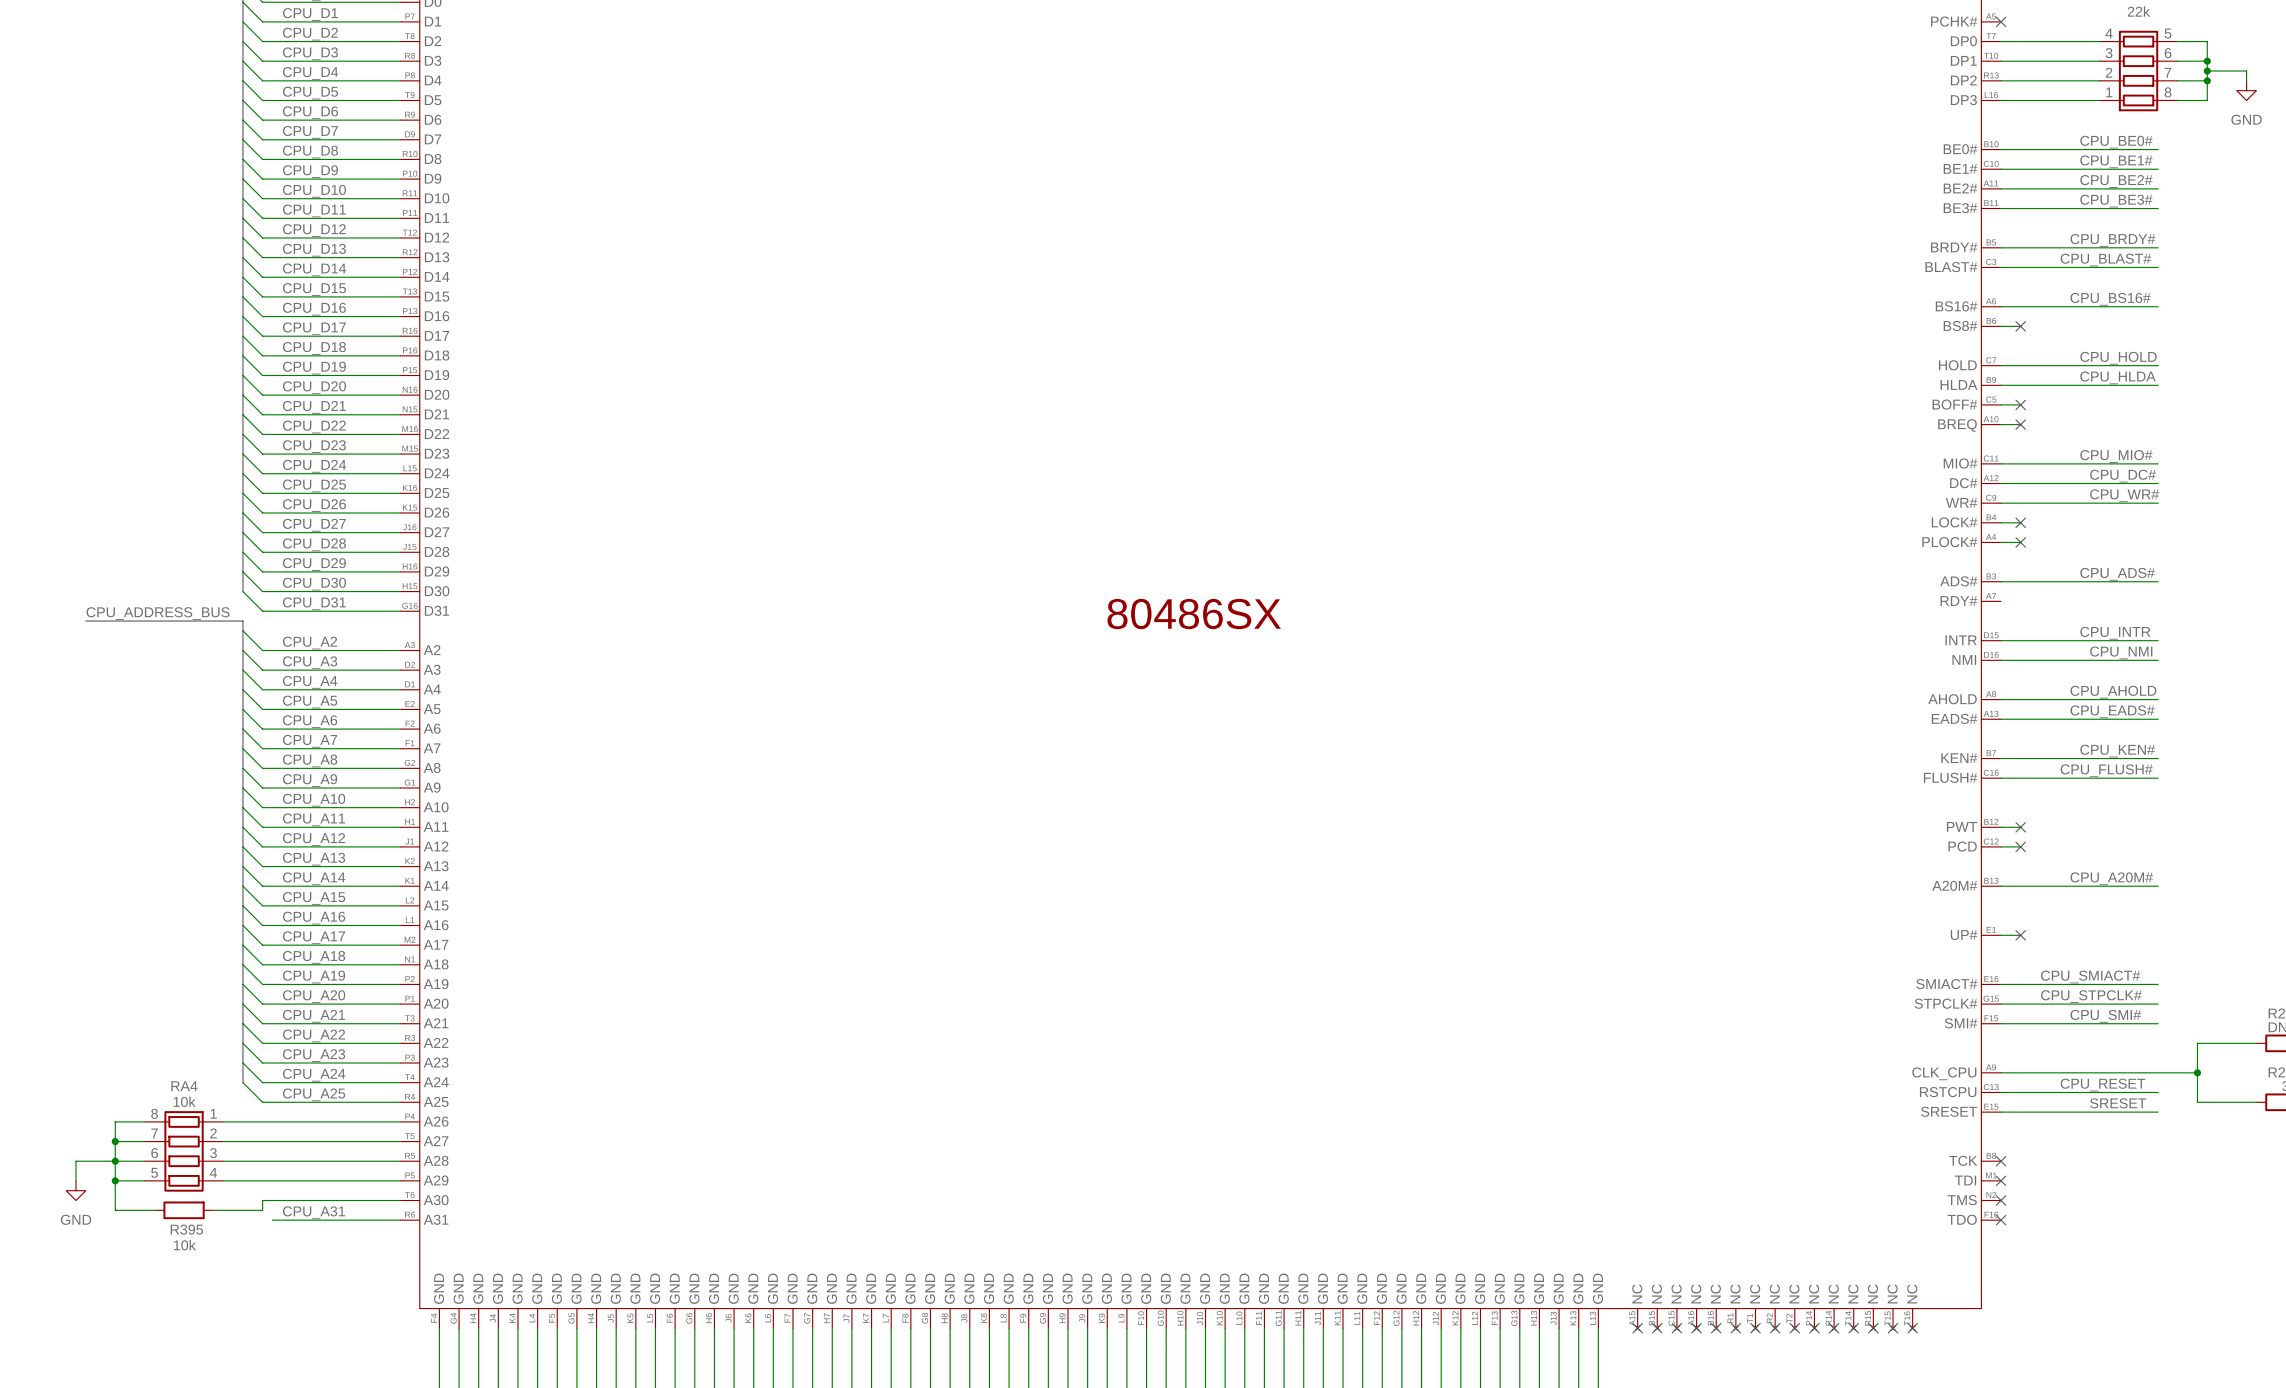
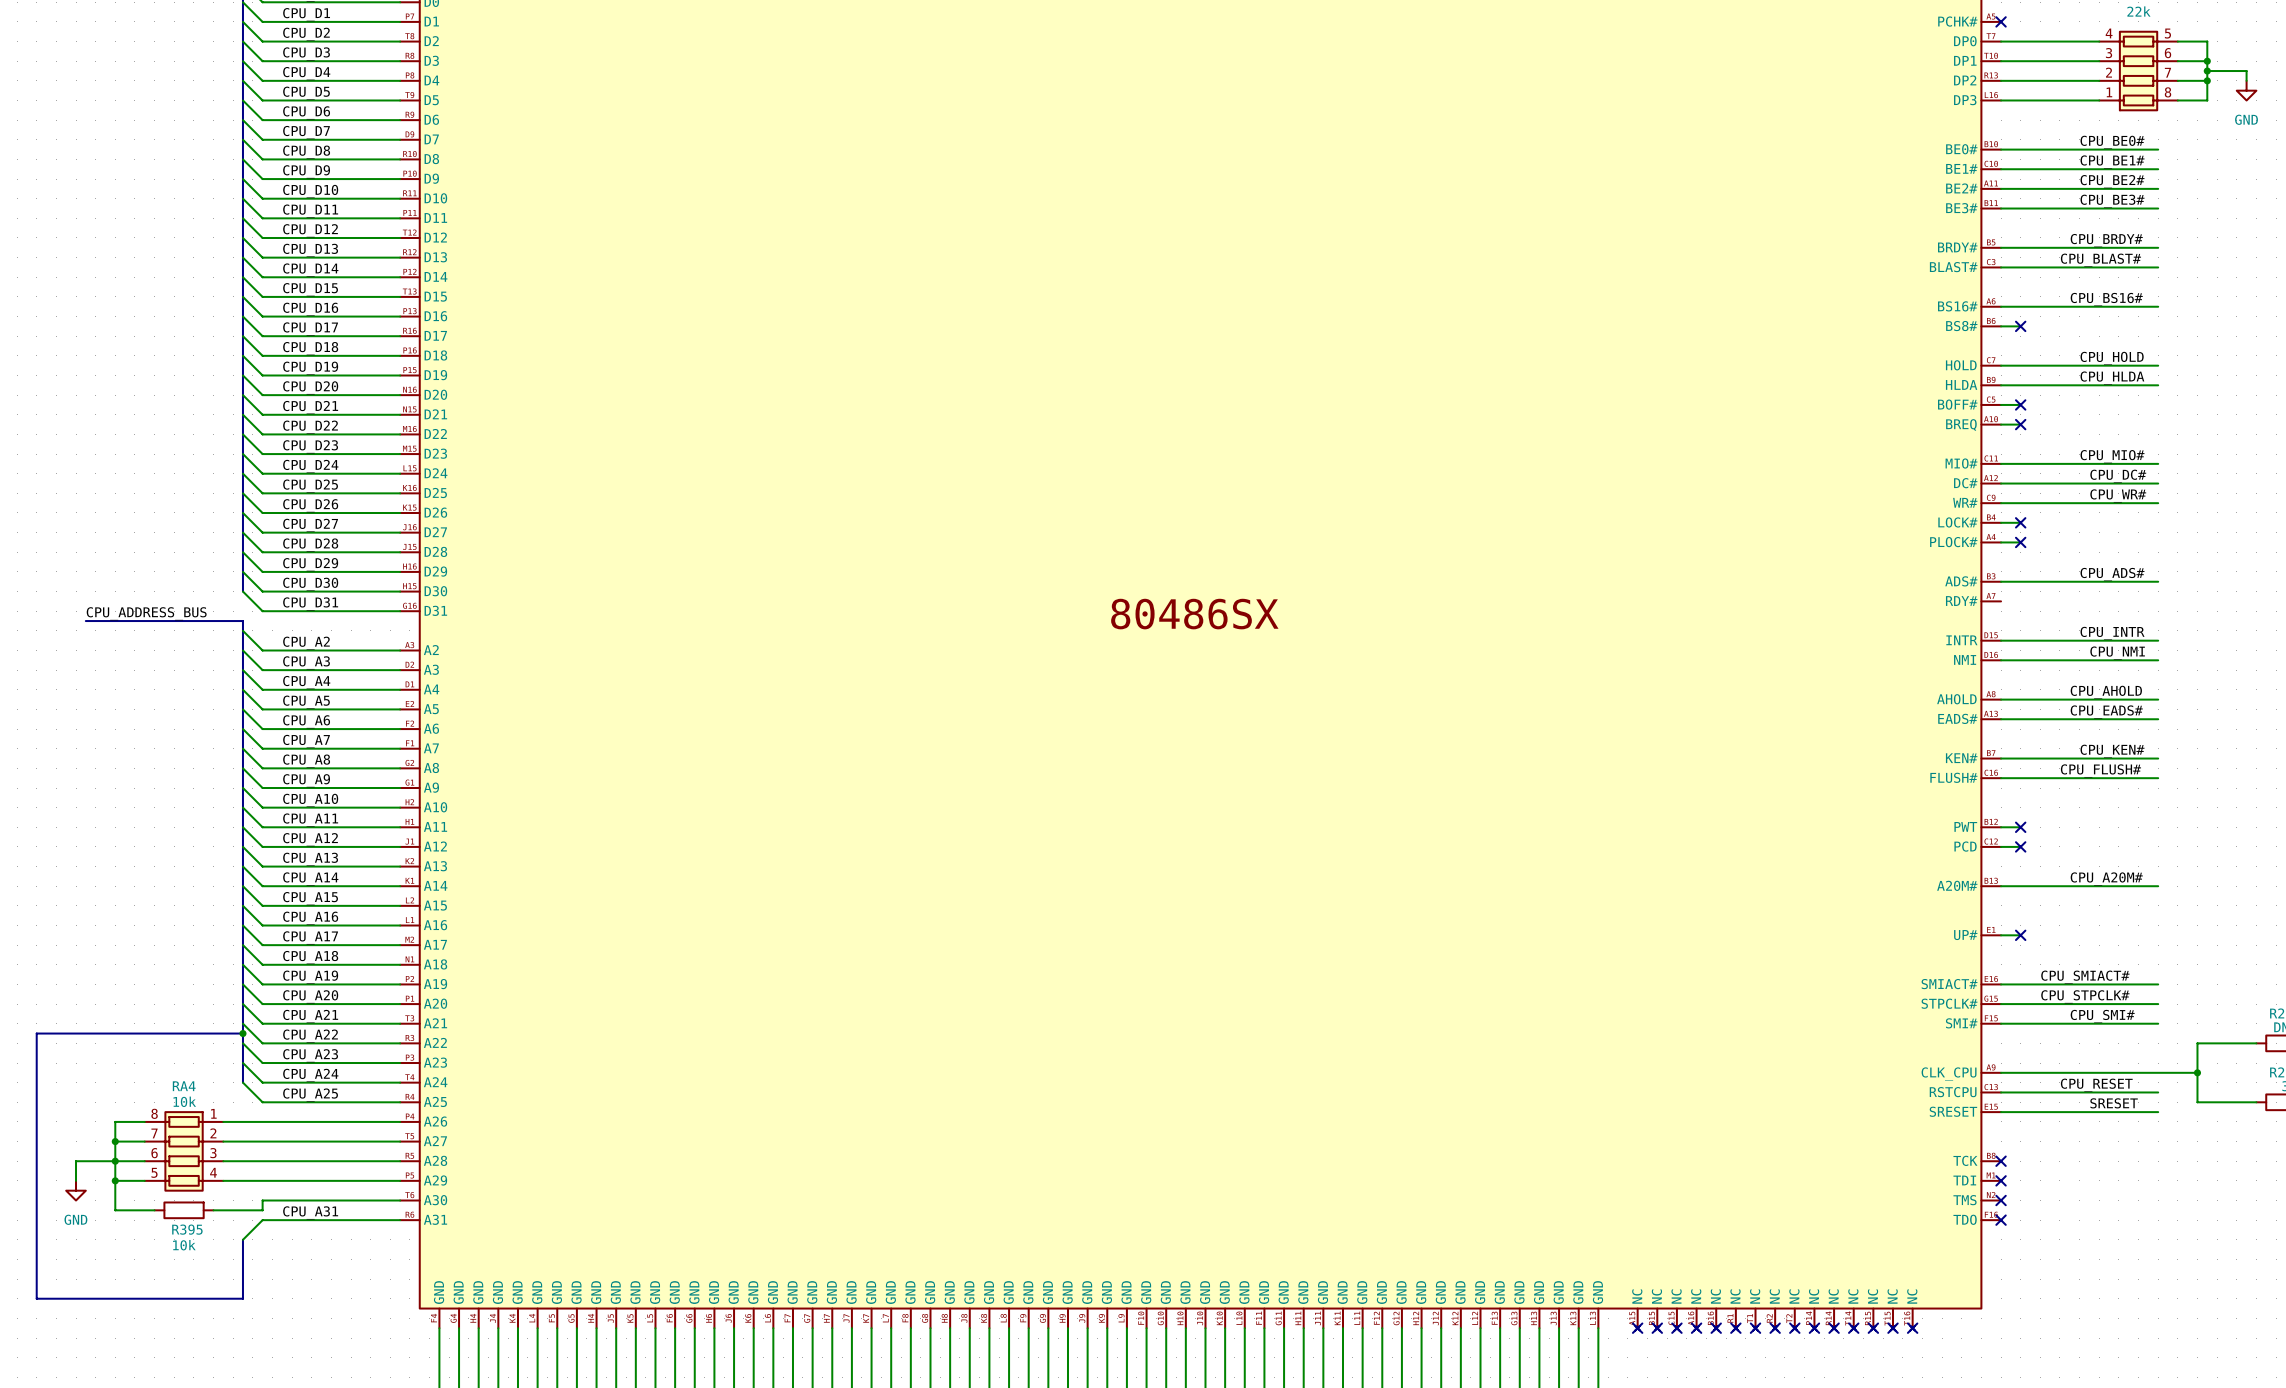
bus: none -> (242, 1033) (36, 1033) (36, 1298) (242, 1298) (242, 1239)
junction: none -> (242, 1033)
wire: none -> (272, 1220) (262, 1220) (242, 1239)

